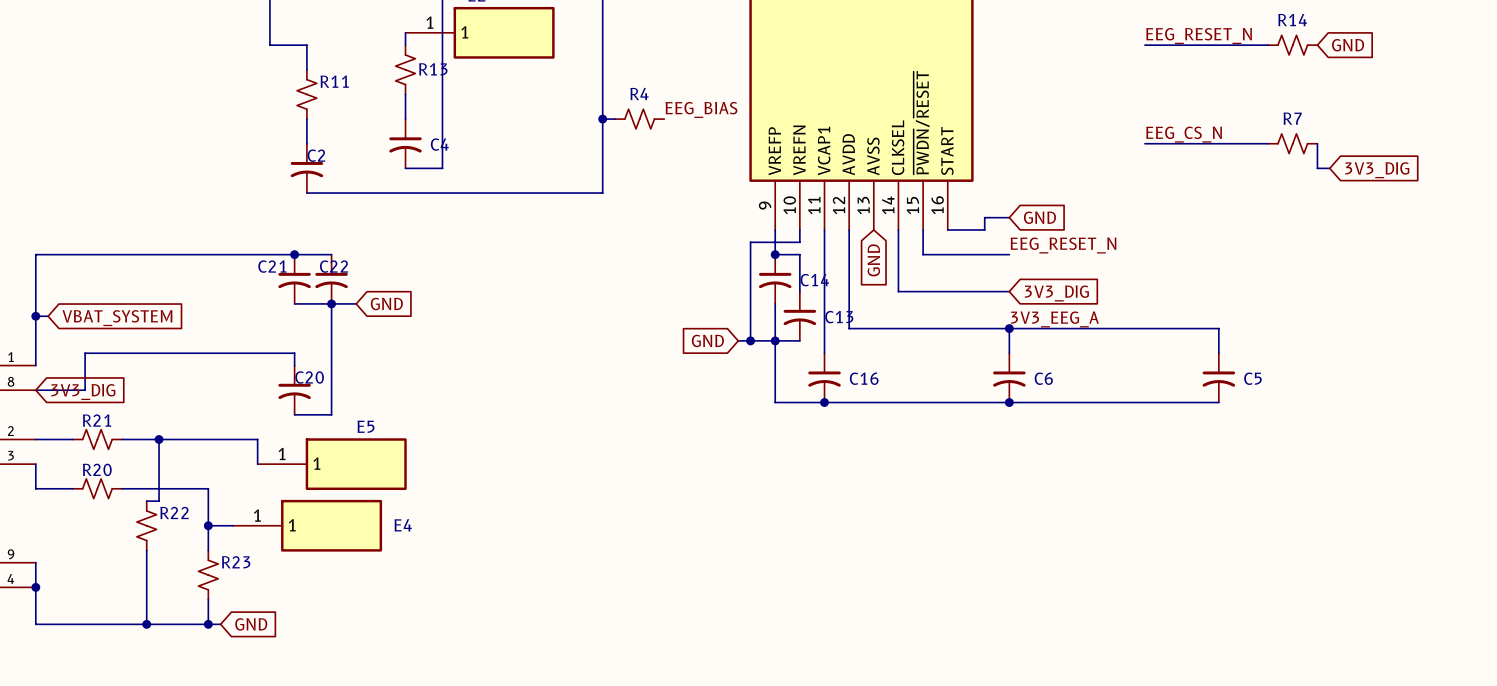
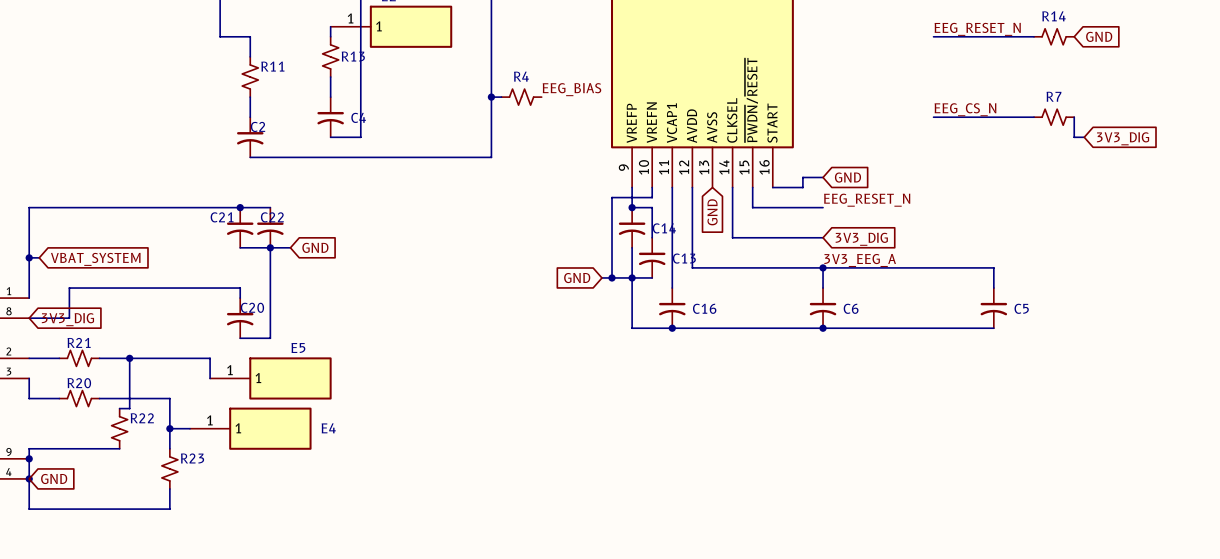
wire: (146, 550) (146, 624) -> (119, 448) (29, 448) (29, 458)
junction: none -> (29, 458)
junction: (146, 624) -> none
wire: (208, 624) (220, 624) -> none
junction: (208, 624) -> none
global label position: GND (251, 624) -> GND (54, 478)

